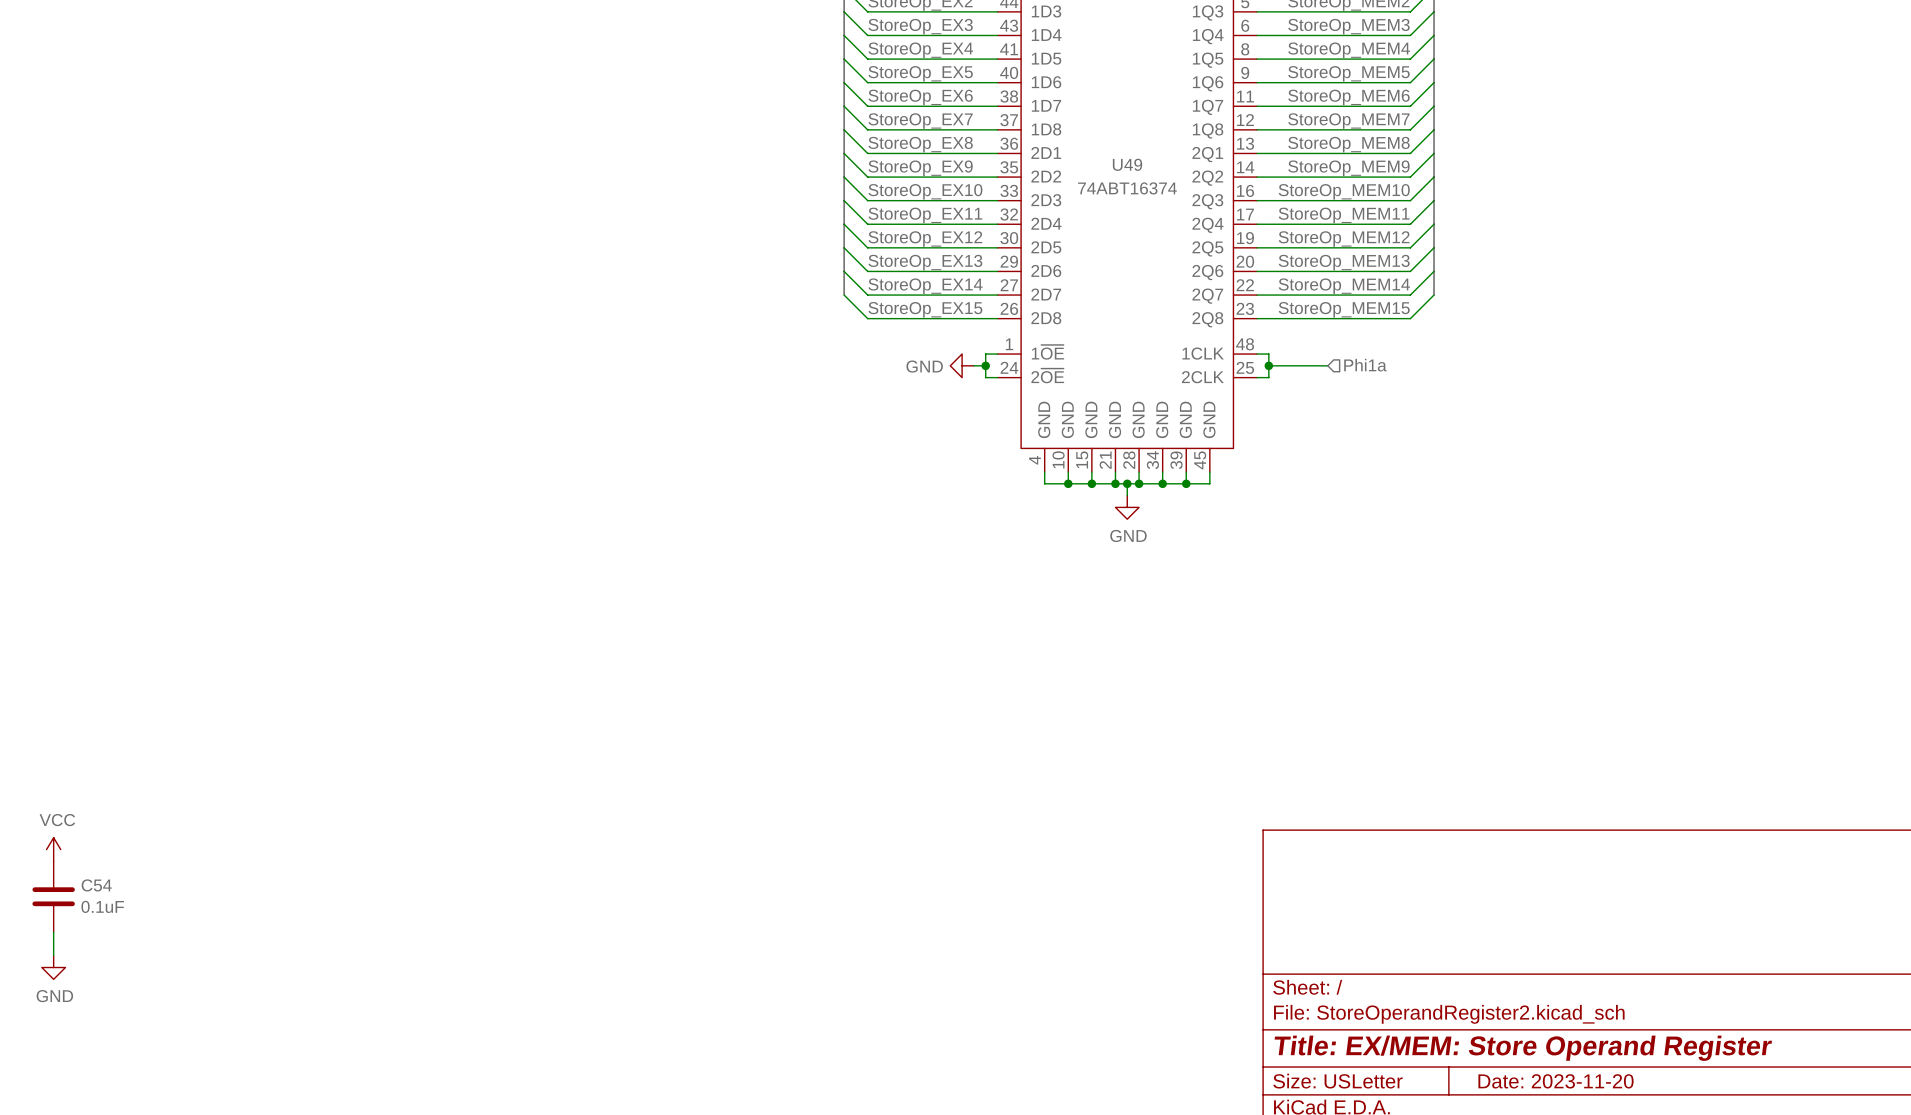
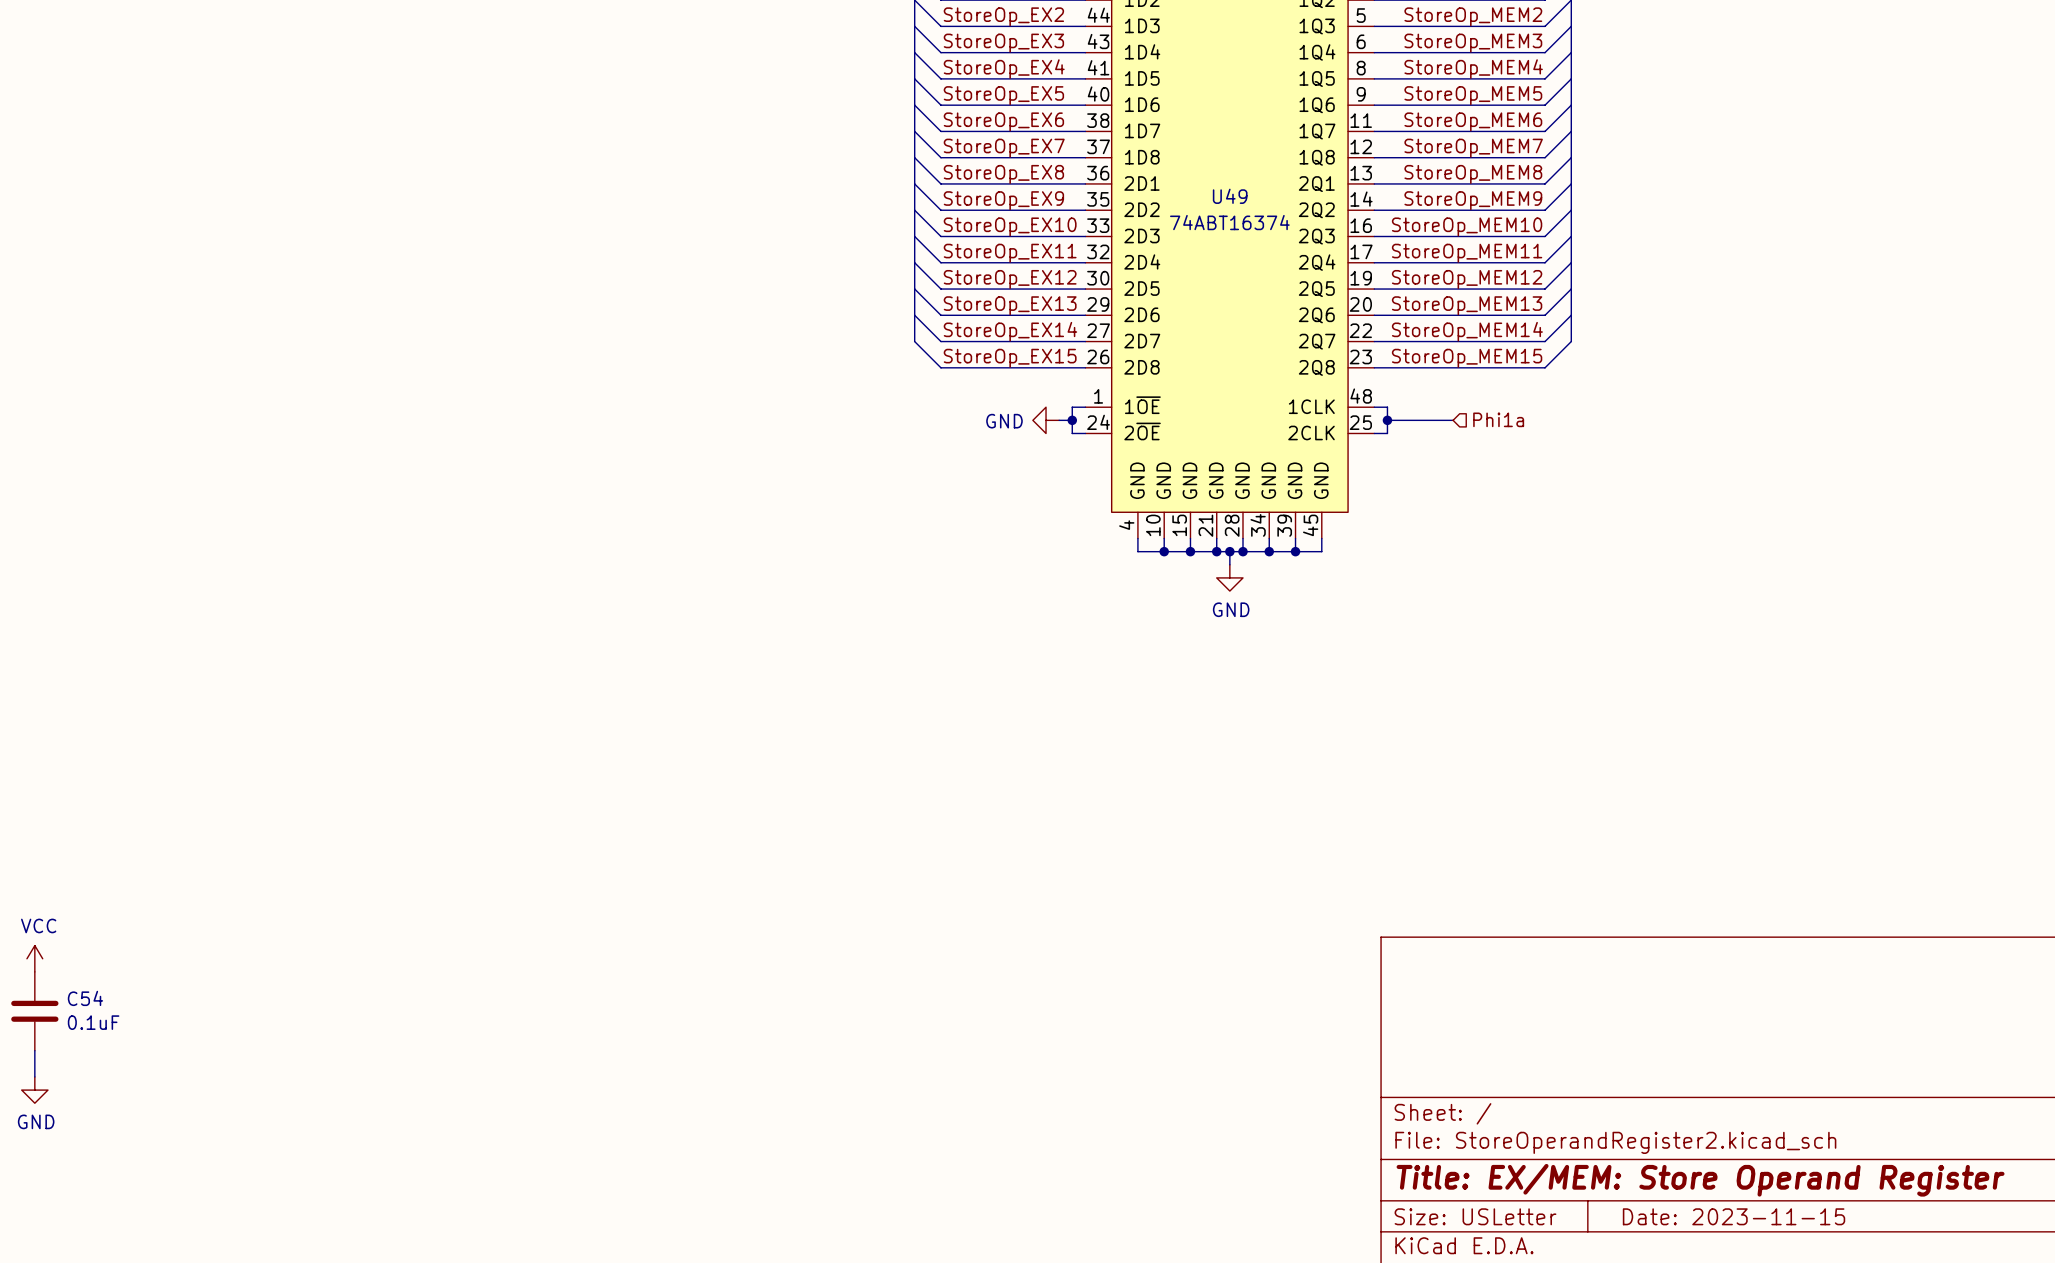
title block: Date: 2023-11-20 (1556, 1081) -> Date: 2023-11-15 (1734, 1216)

